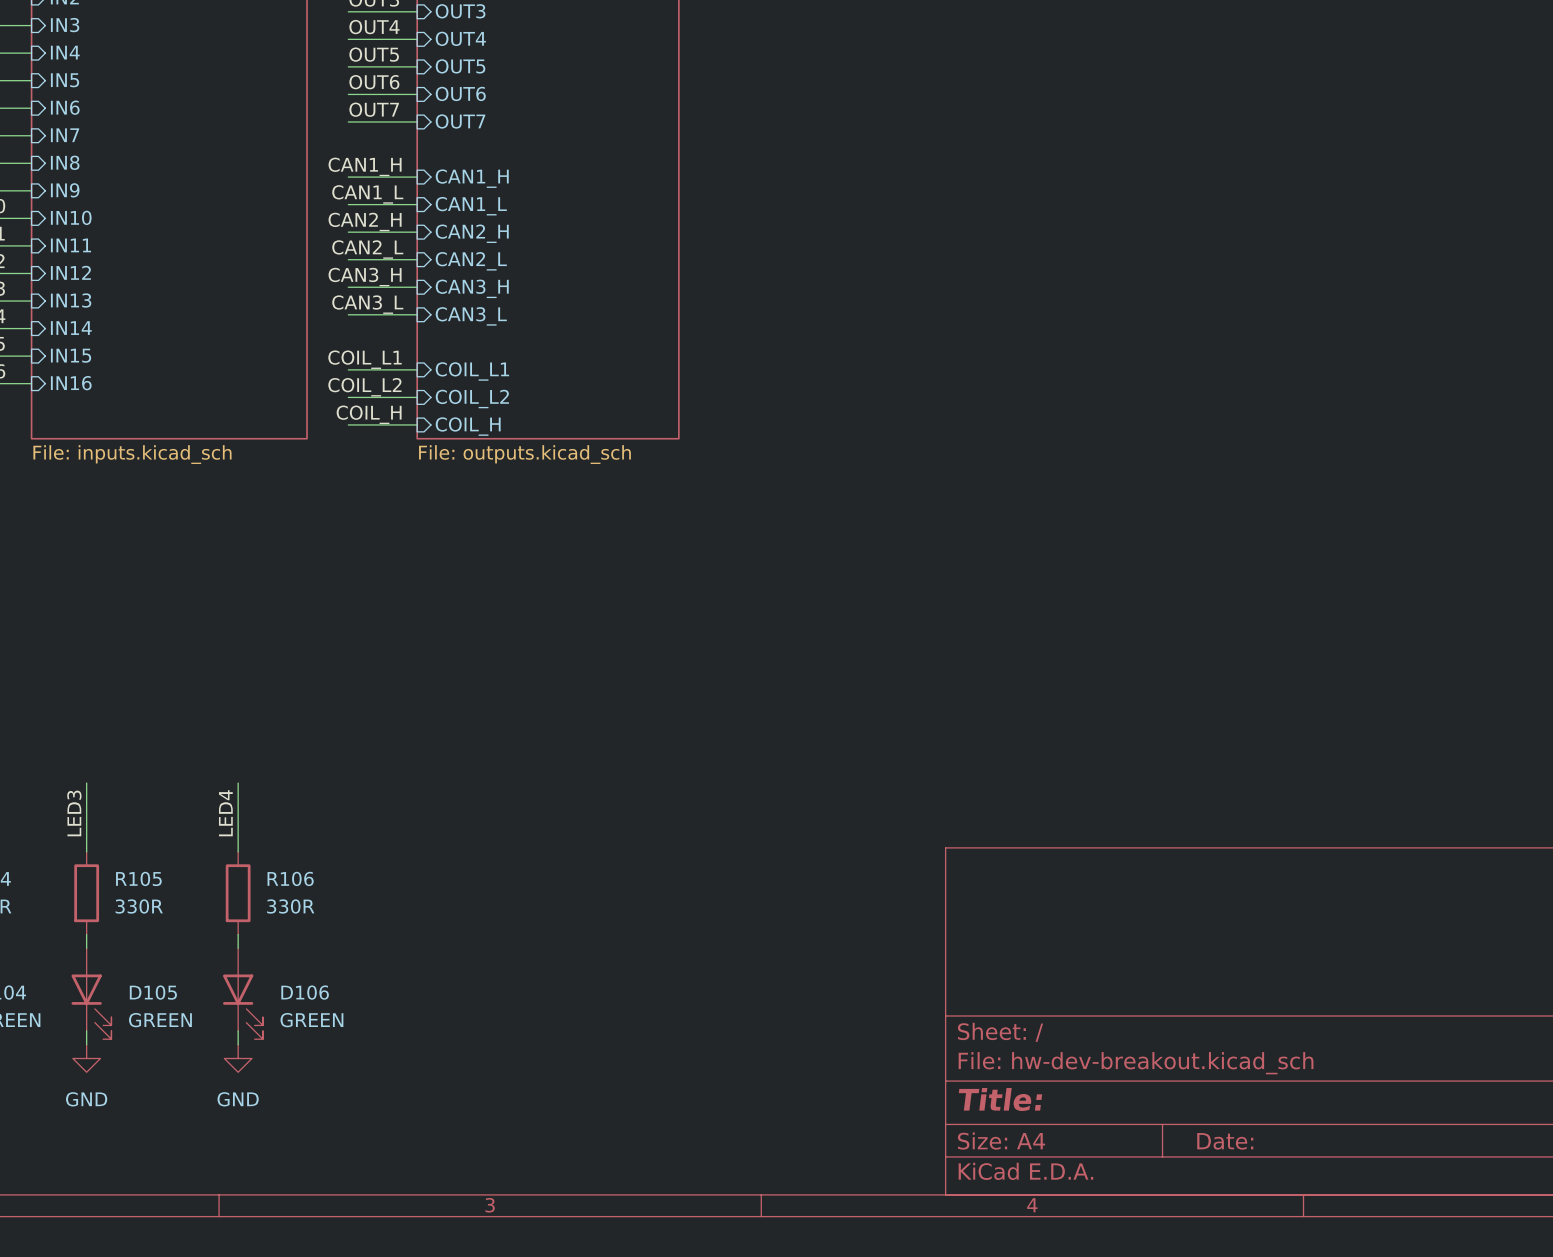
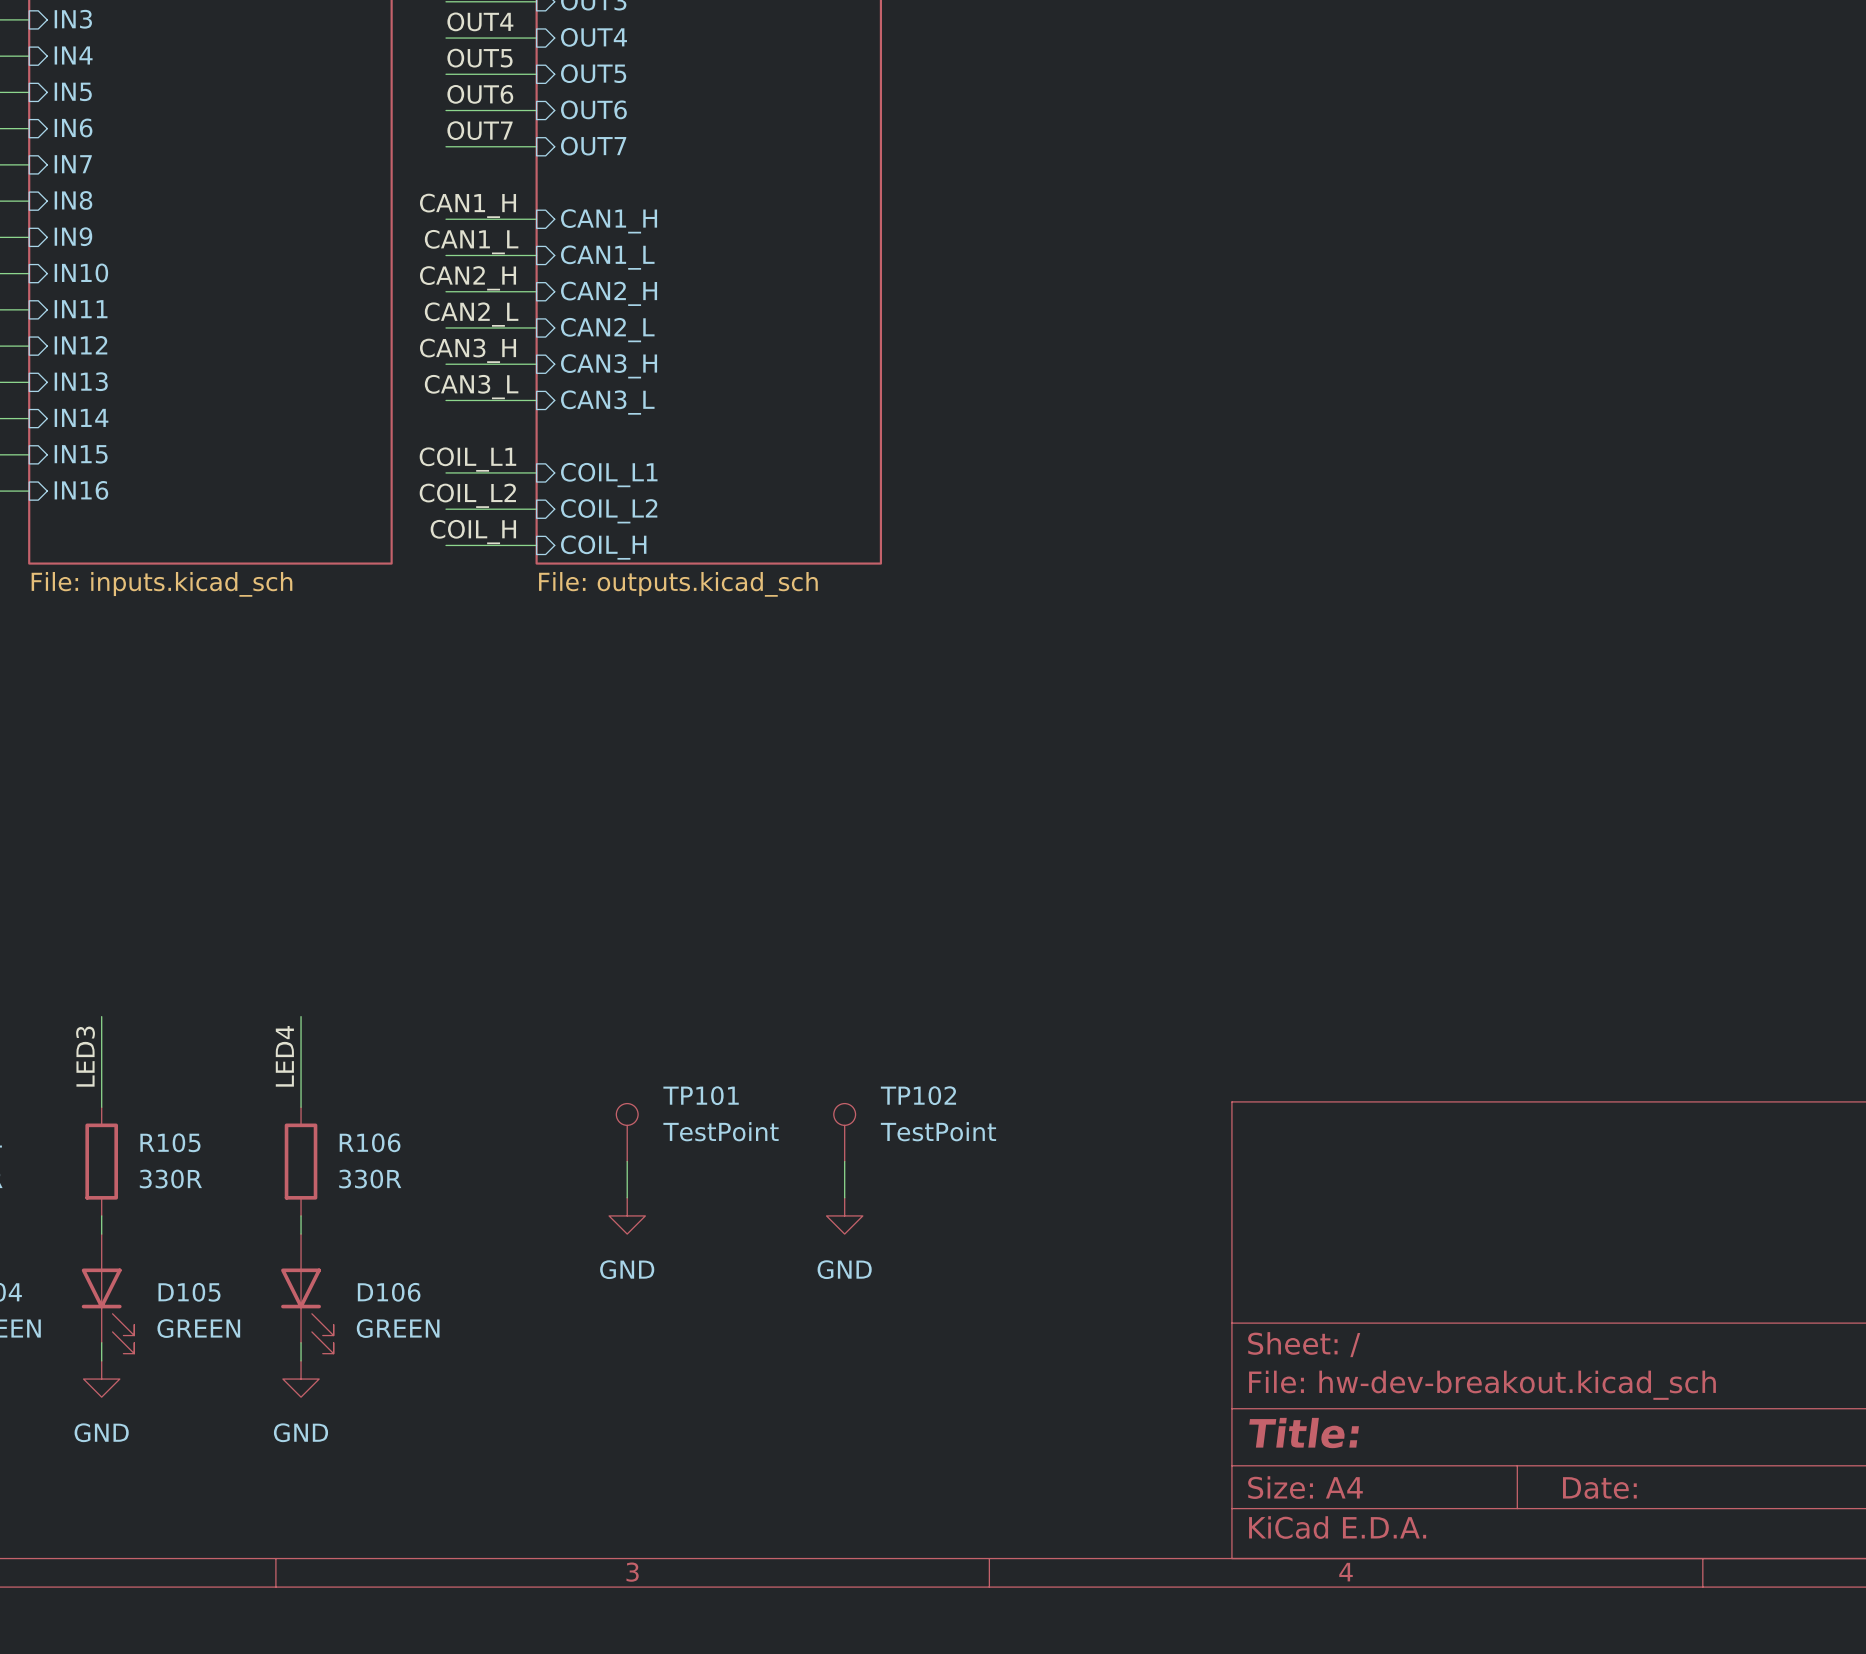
TP101: none -> TestPoint (627, 1132)
TP102: none -> TestPoint (844, 1132)
wire: none -> (627, 1161) (627, 1197)
wire: none -> (844, 1161) (844, 1197)
power symbol: none -> GND (627, 1215)
power symbol: none -> GND (844, 1215)

